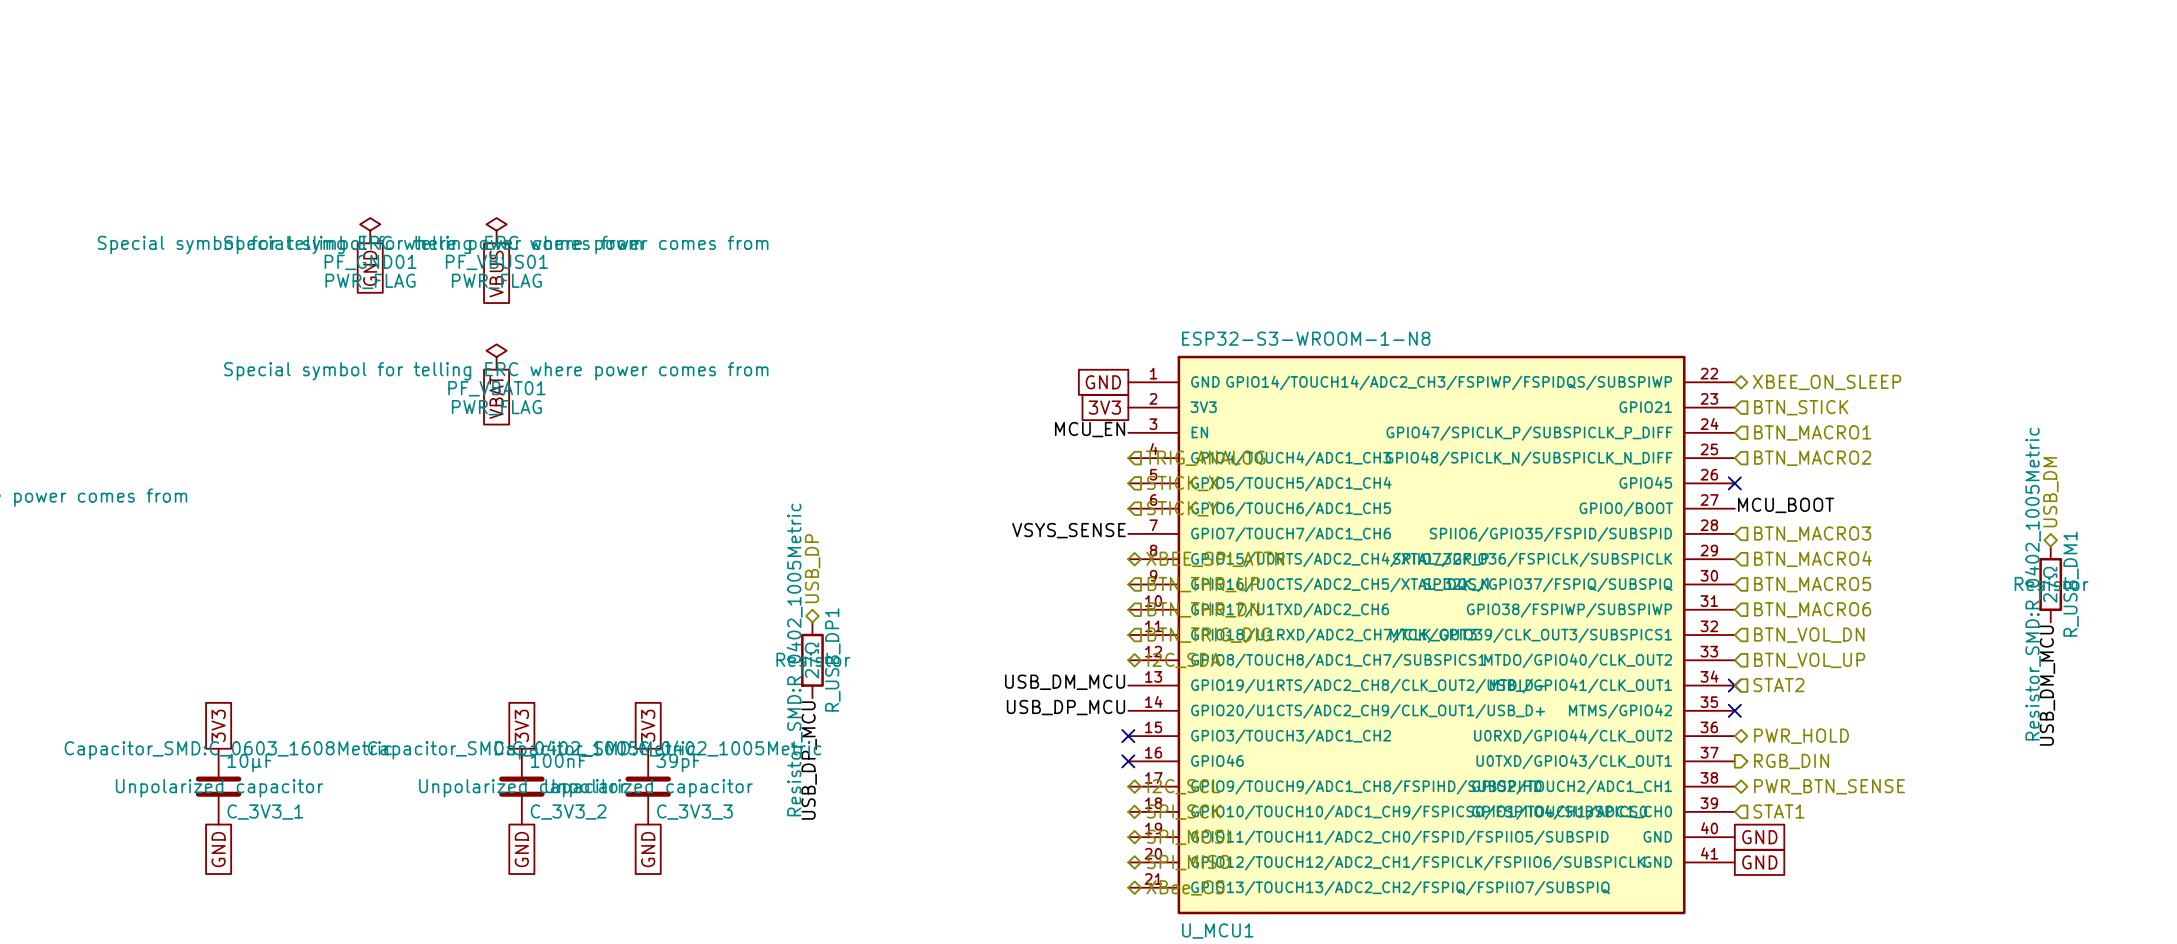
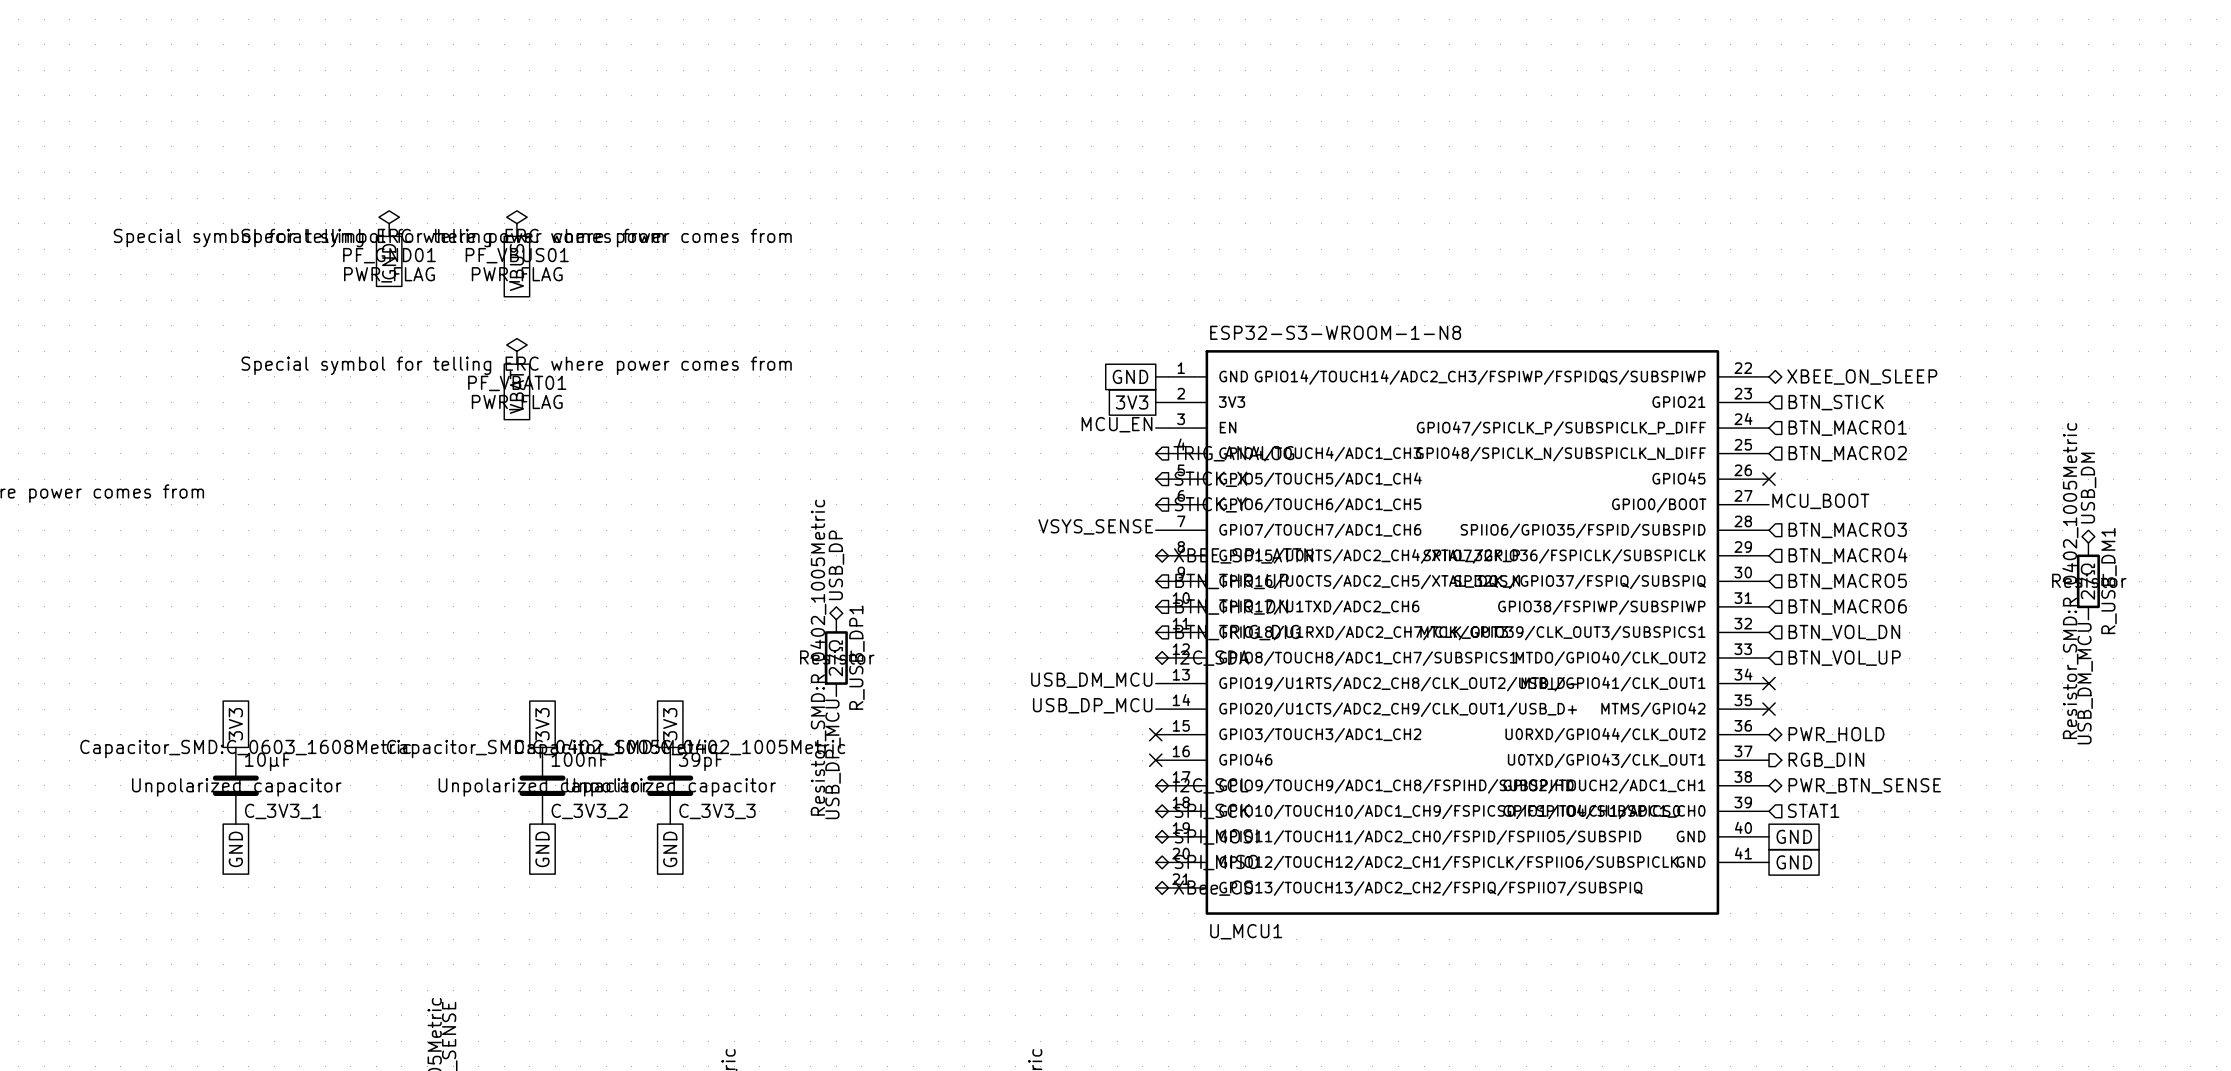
hierarchical label: STAT2 (1778, 685) -> none

